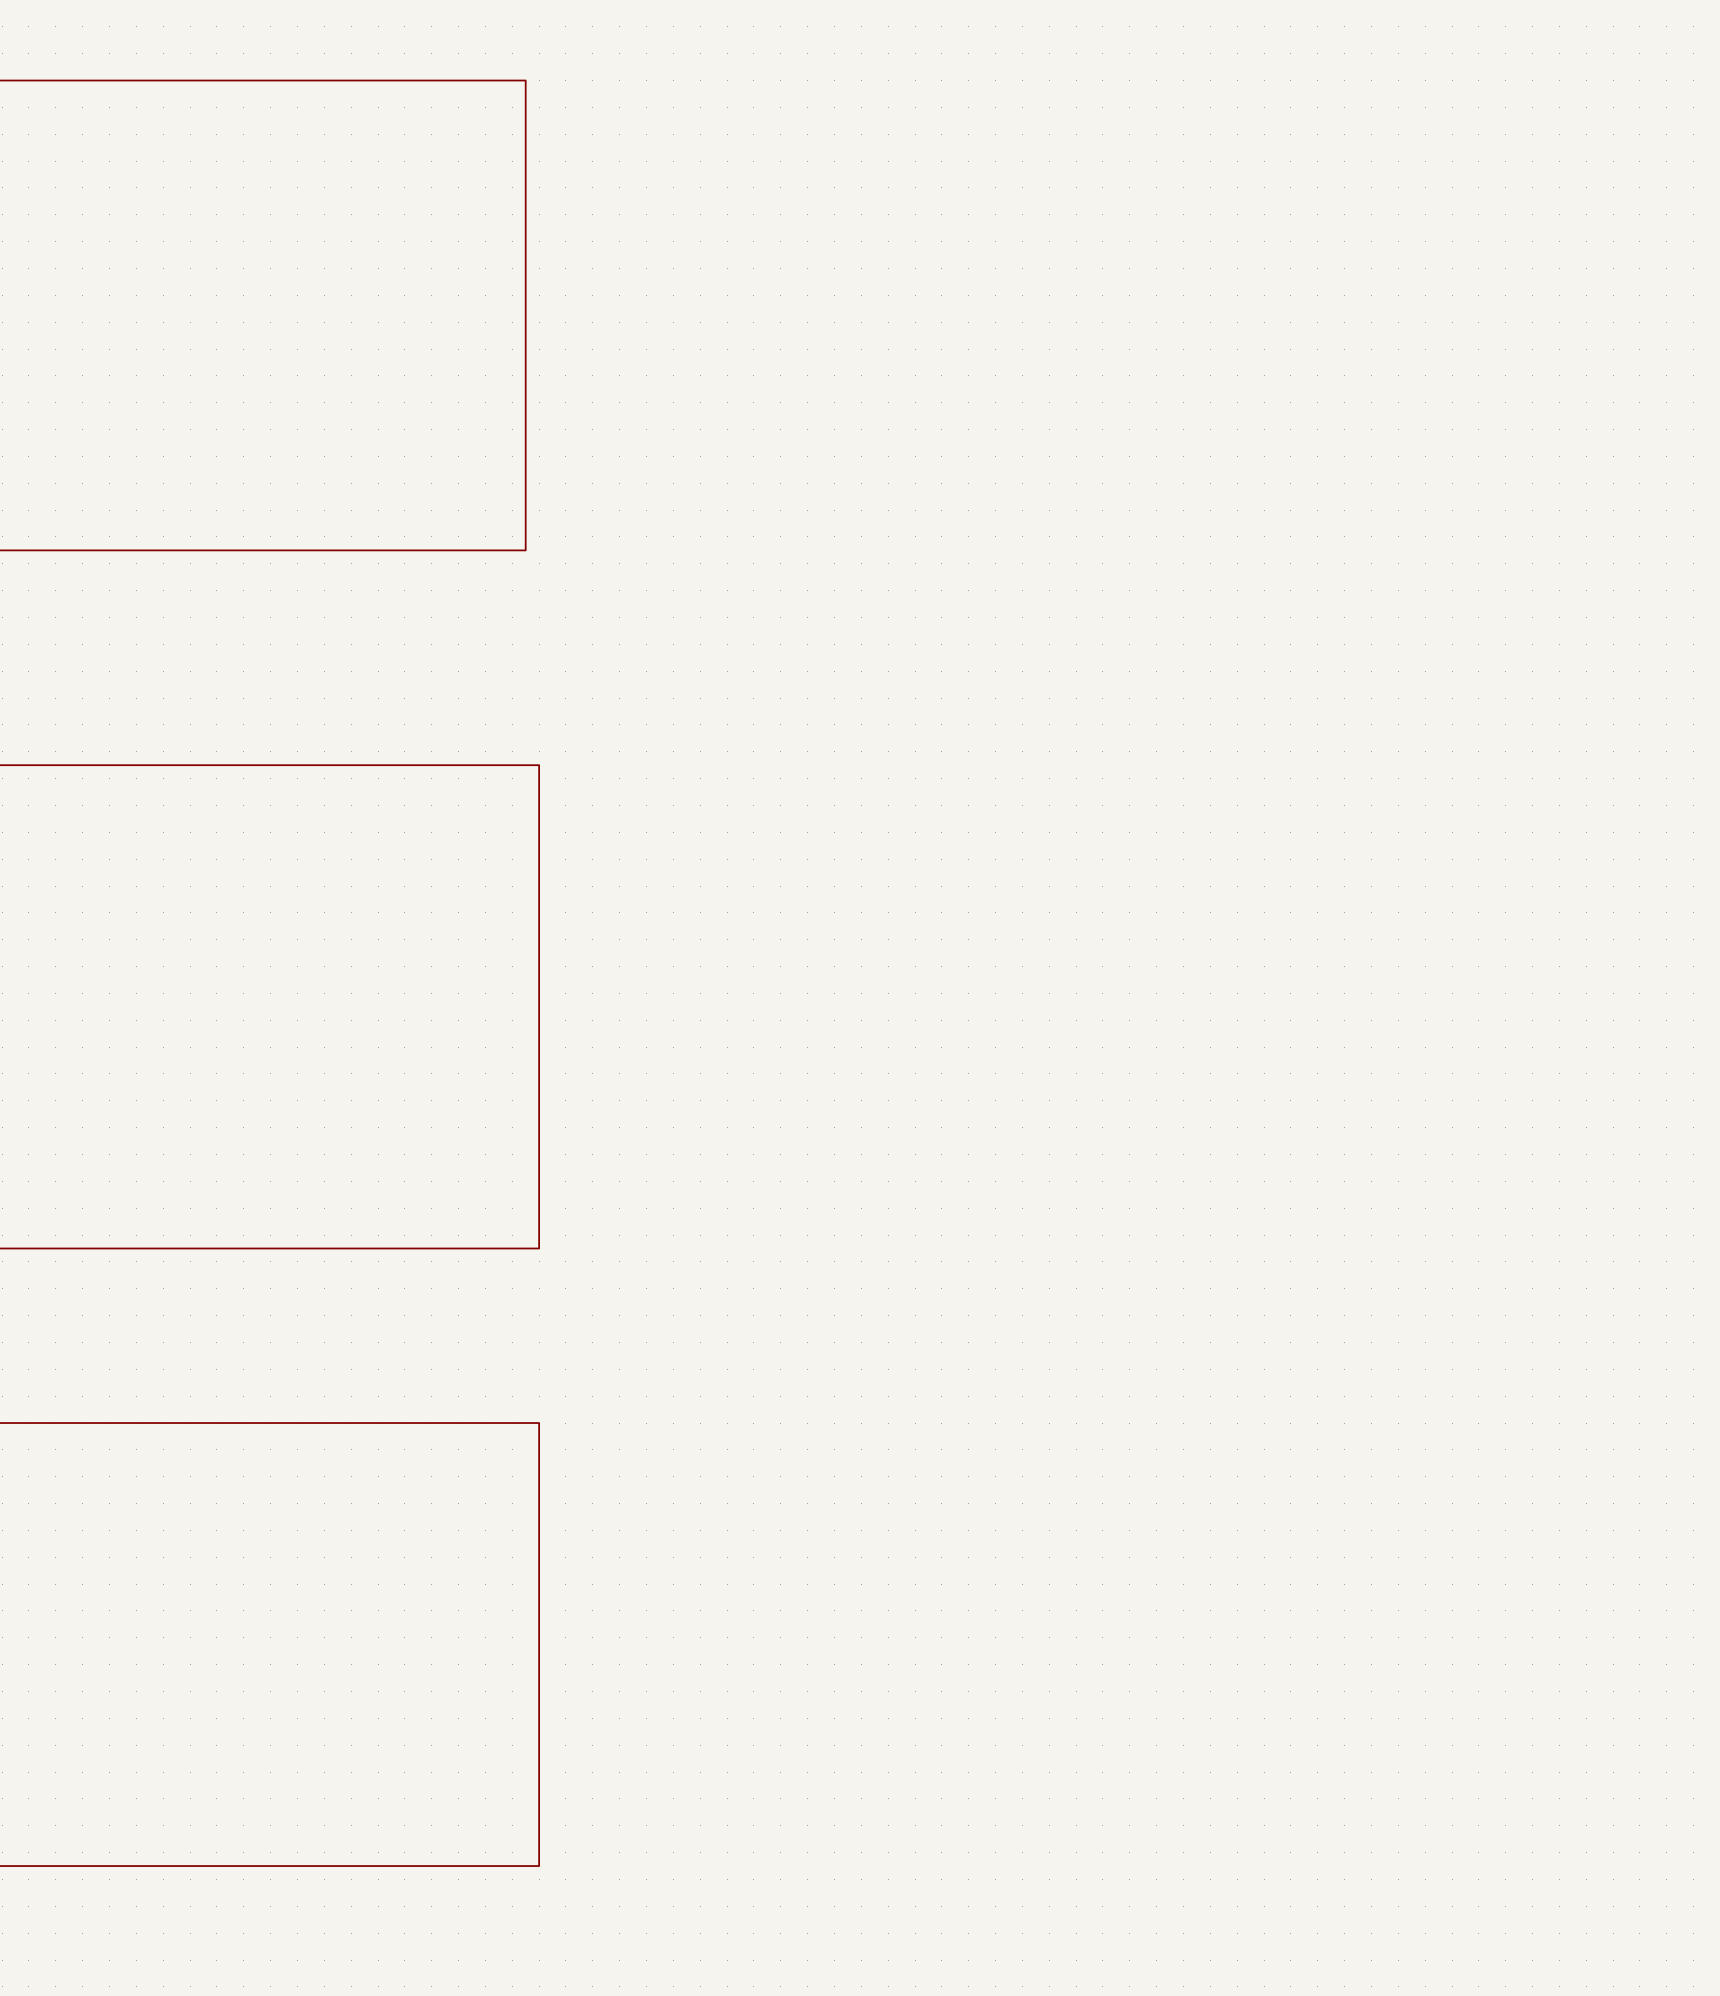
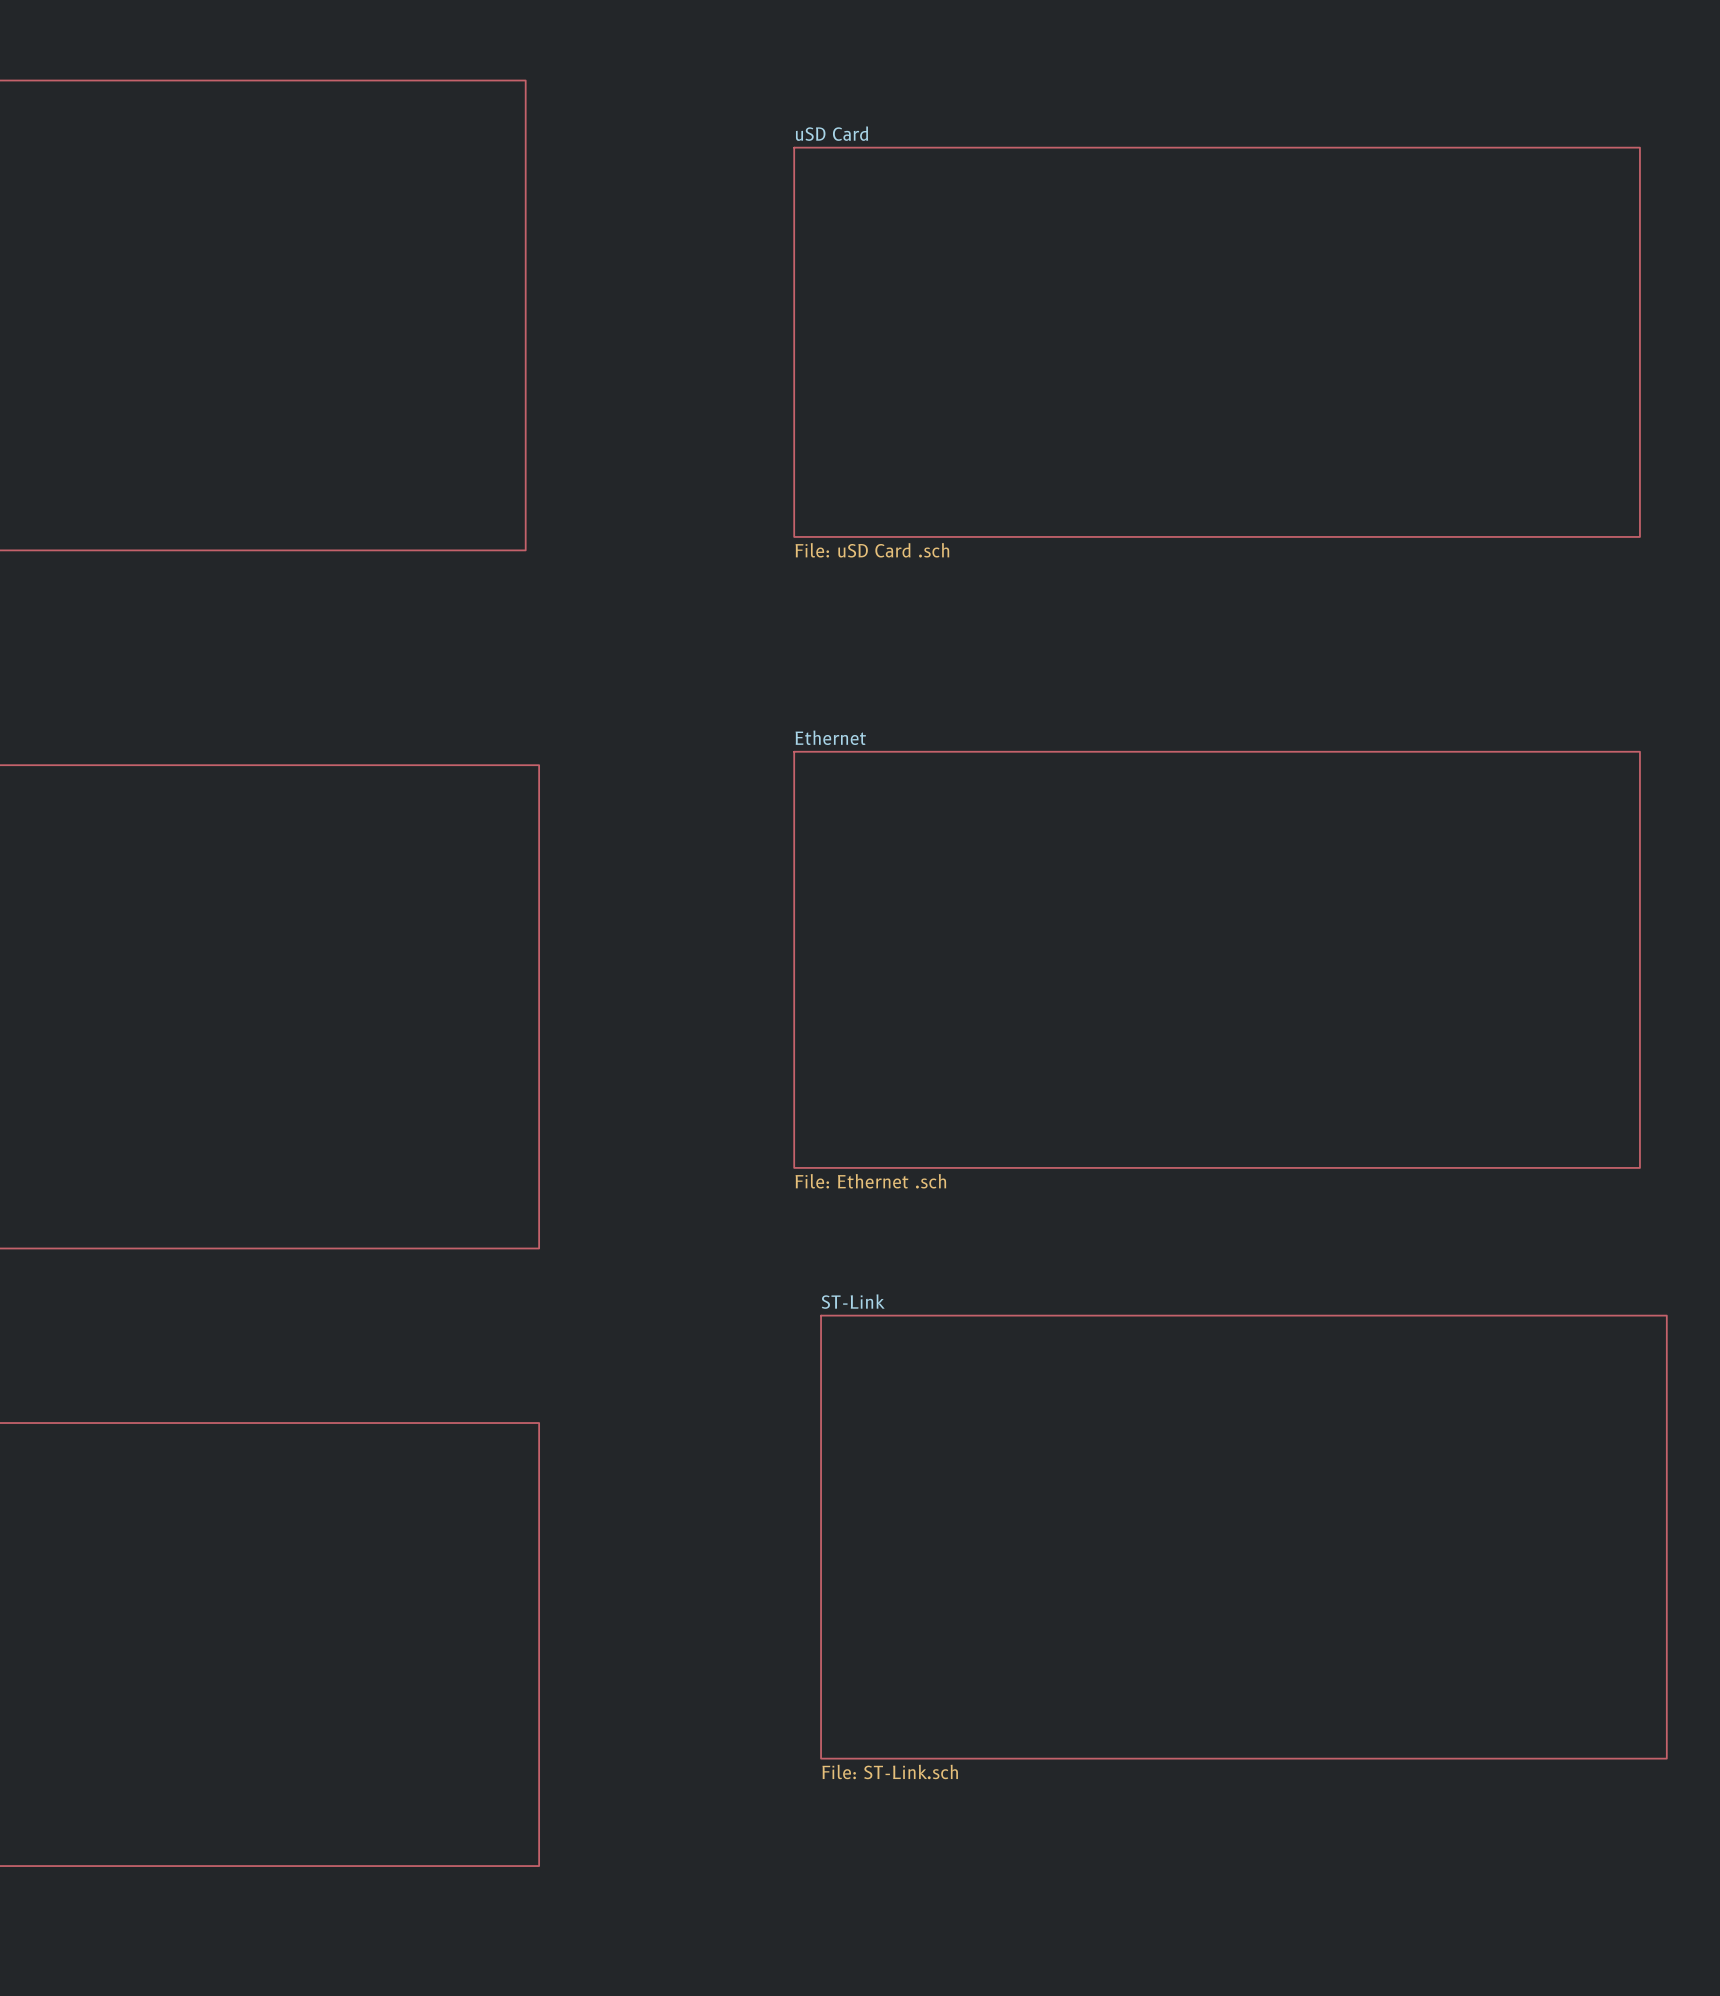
sheet uSD Card: none -> File: uSD Card .sch (1217, 342)
sheet Ethernet: none -> File: Ethernet .sch (1217, 959)
sheet ST-Link: none -> File: ST-Link.sch (1243, 1537)

